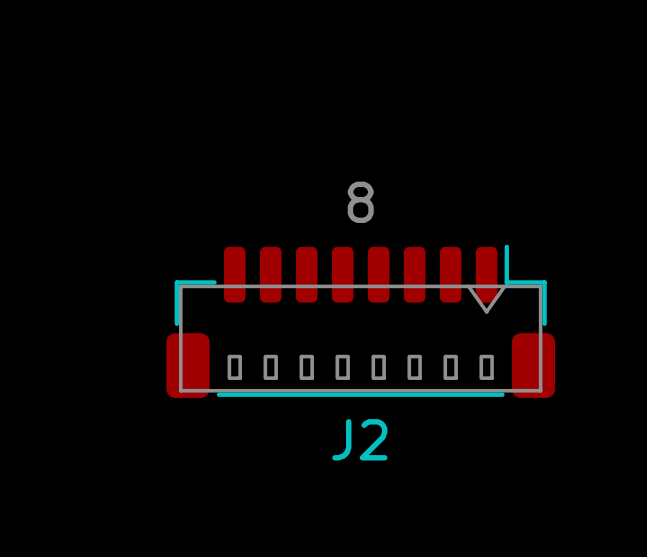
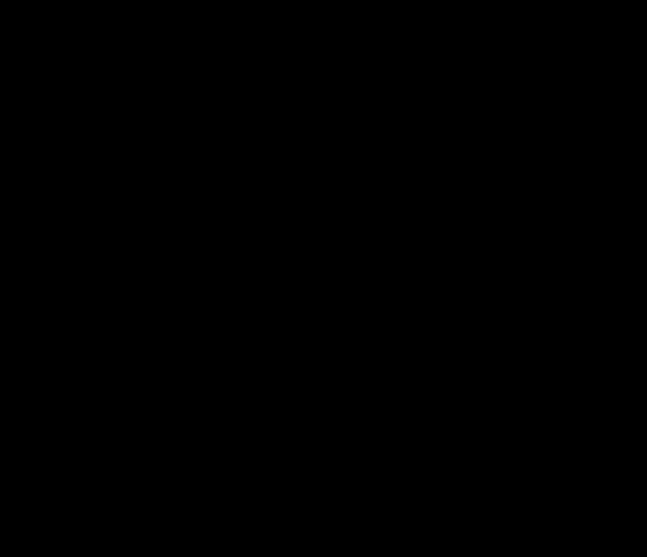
J2: 8 (360, 321) -> none

